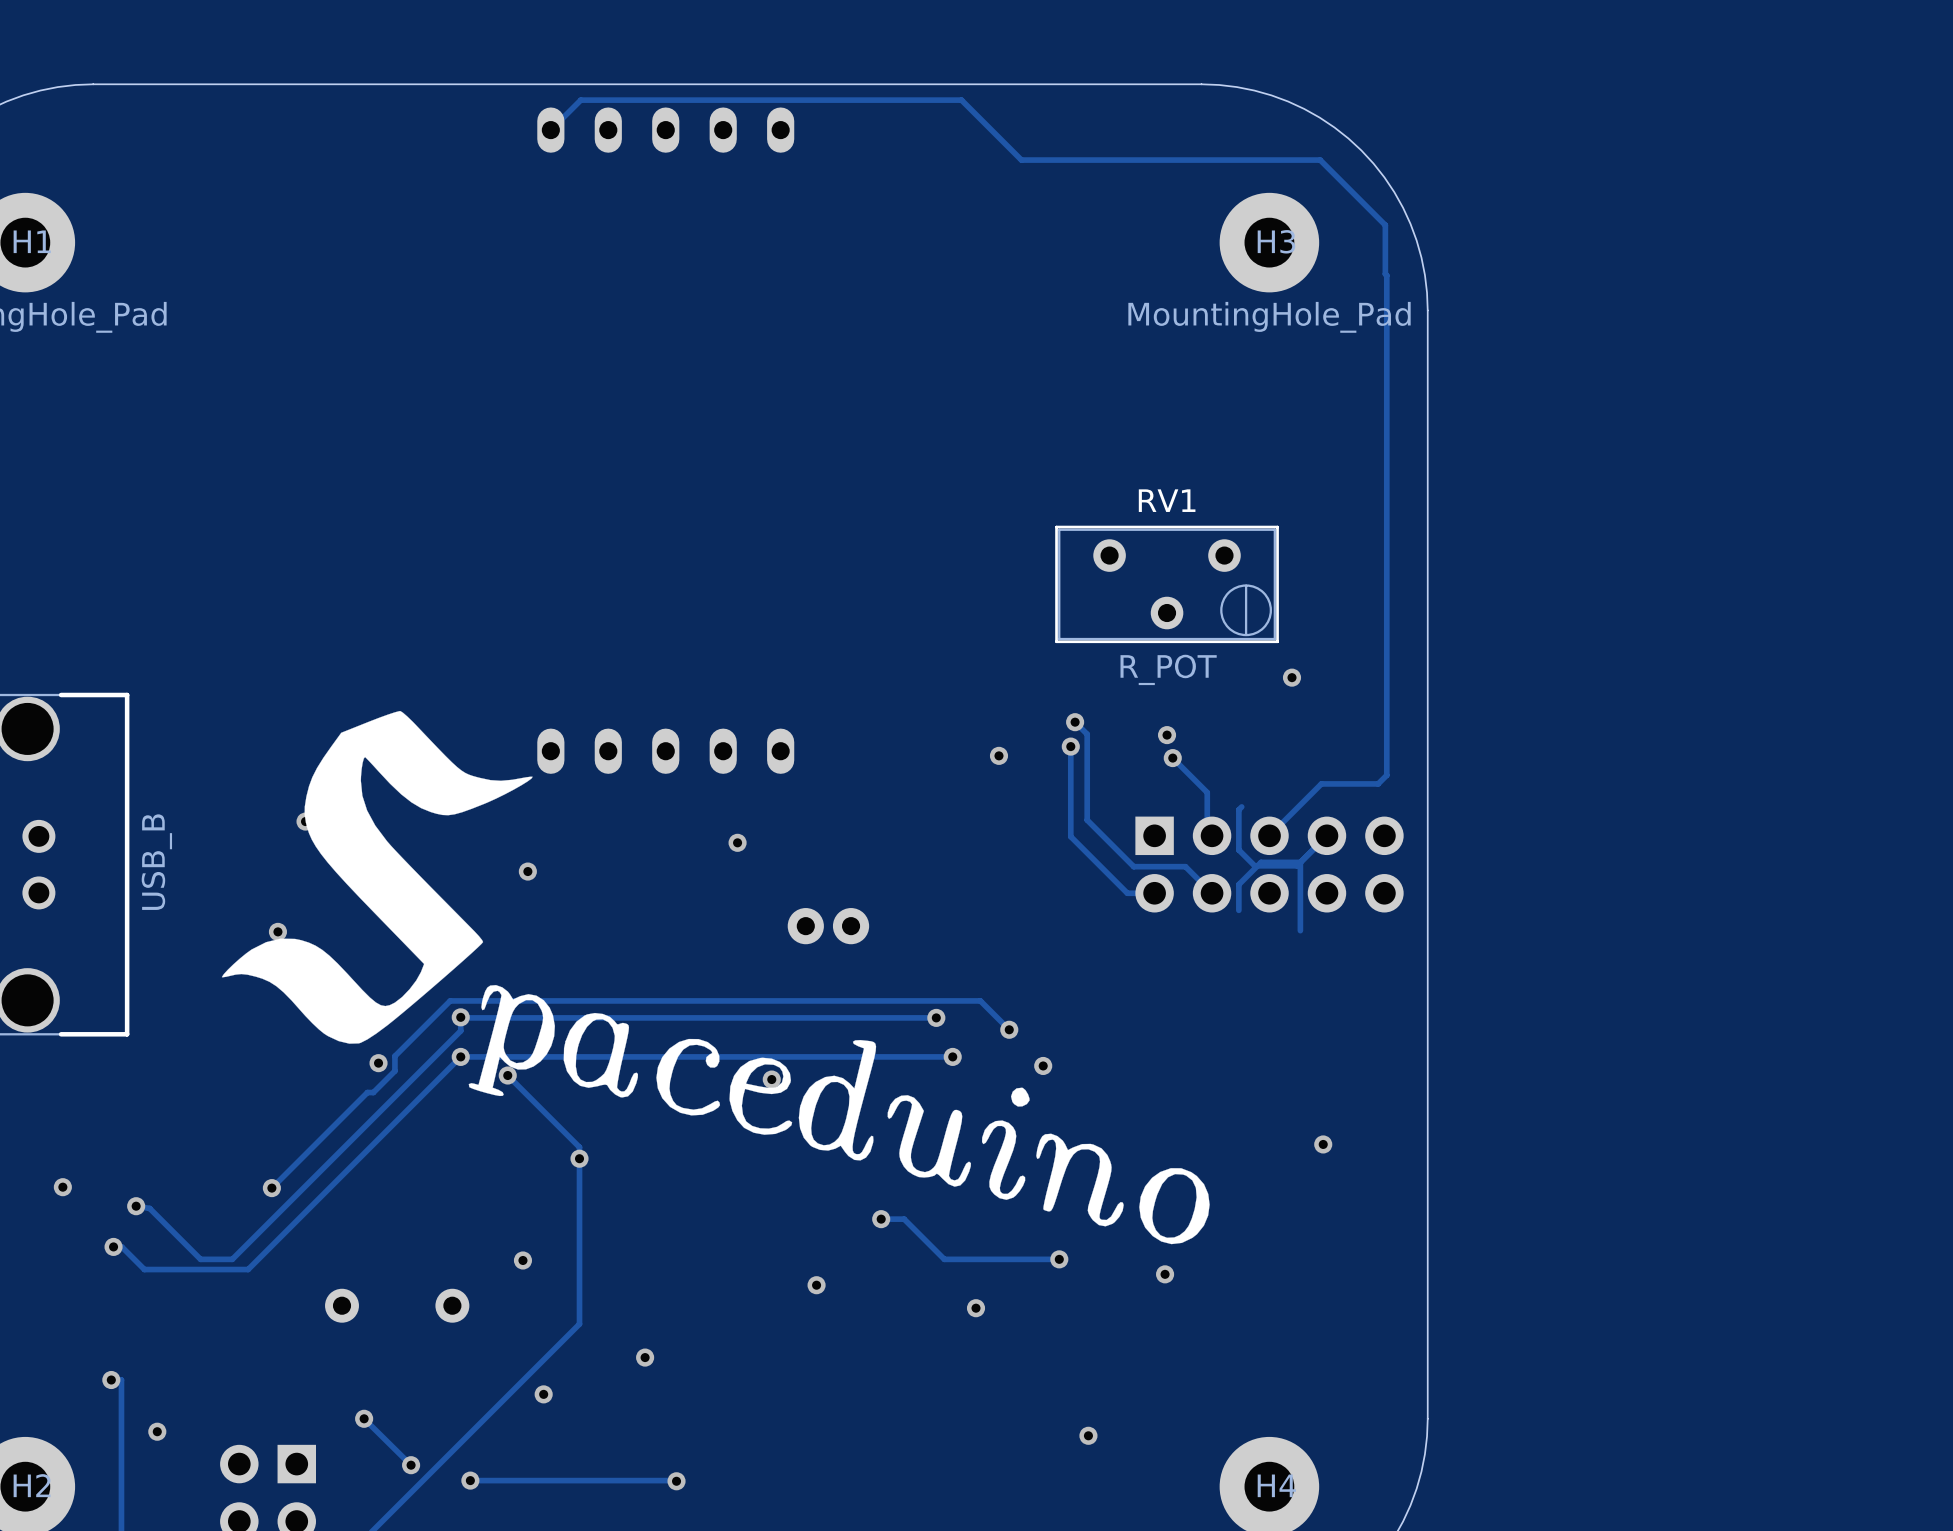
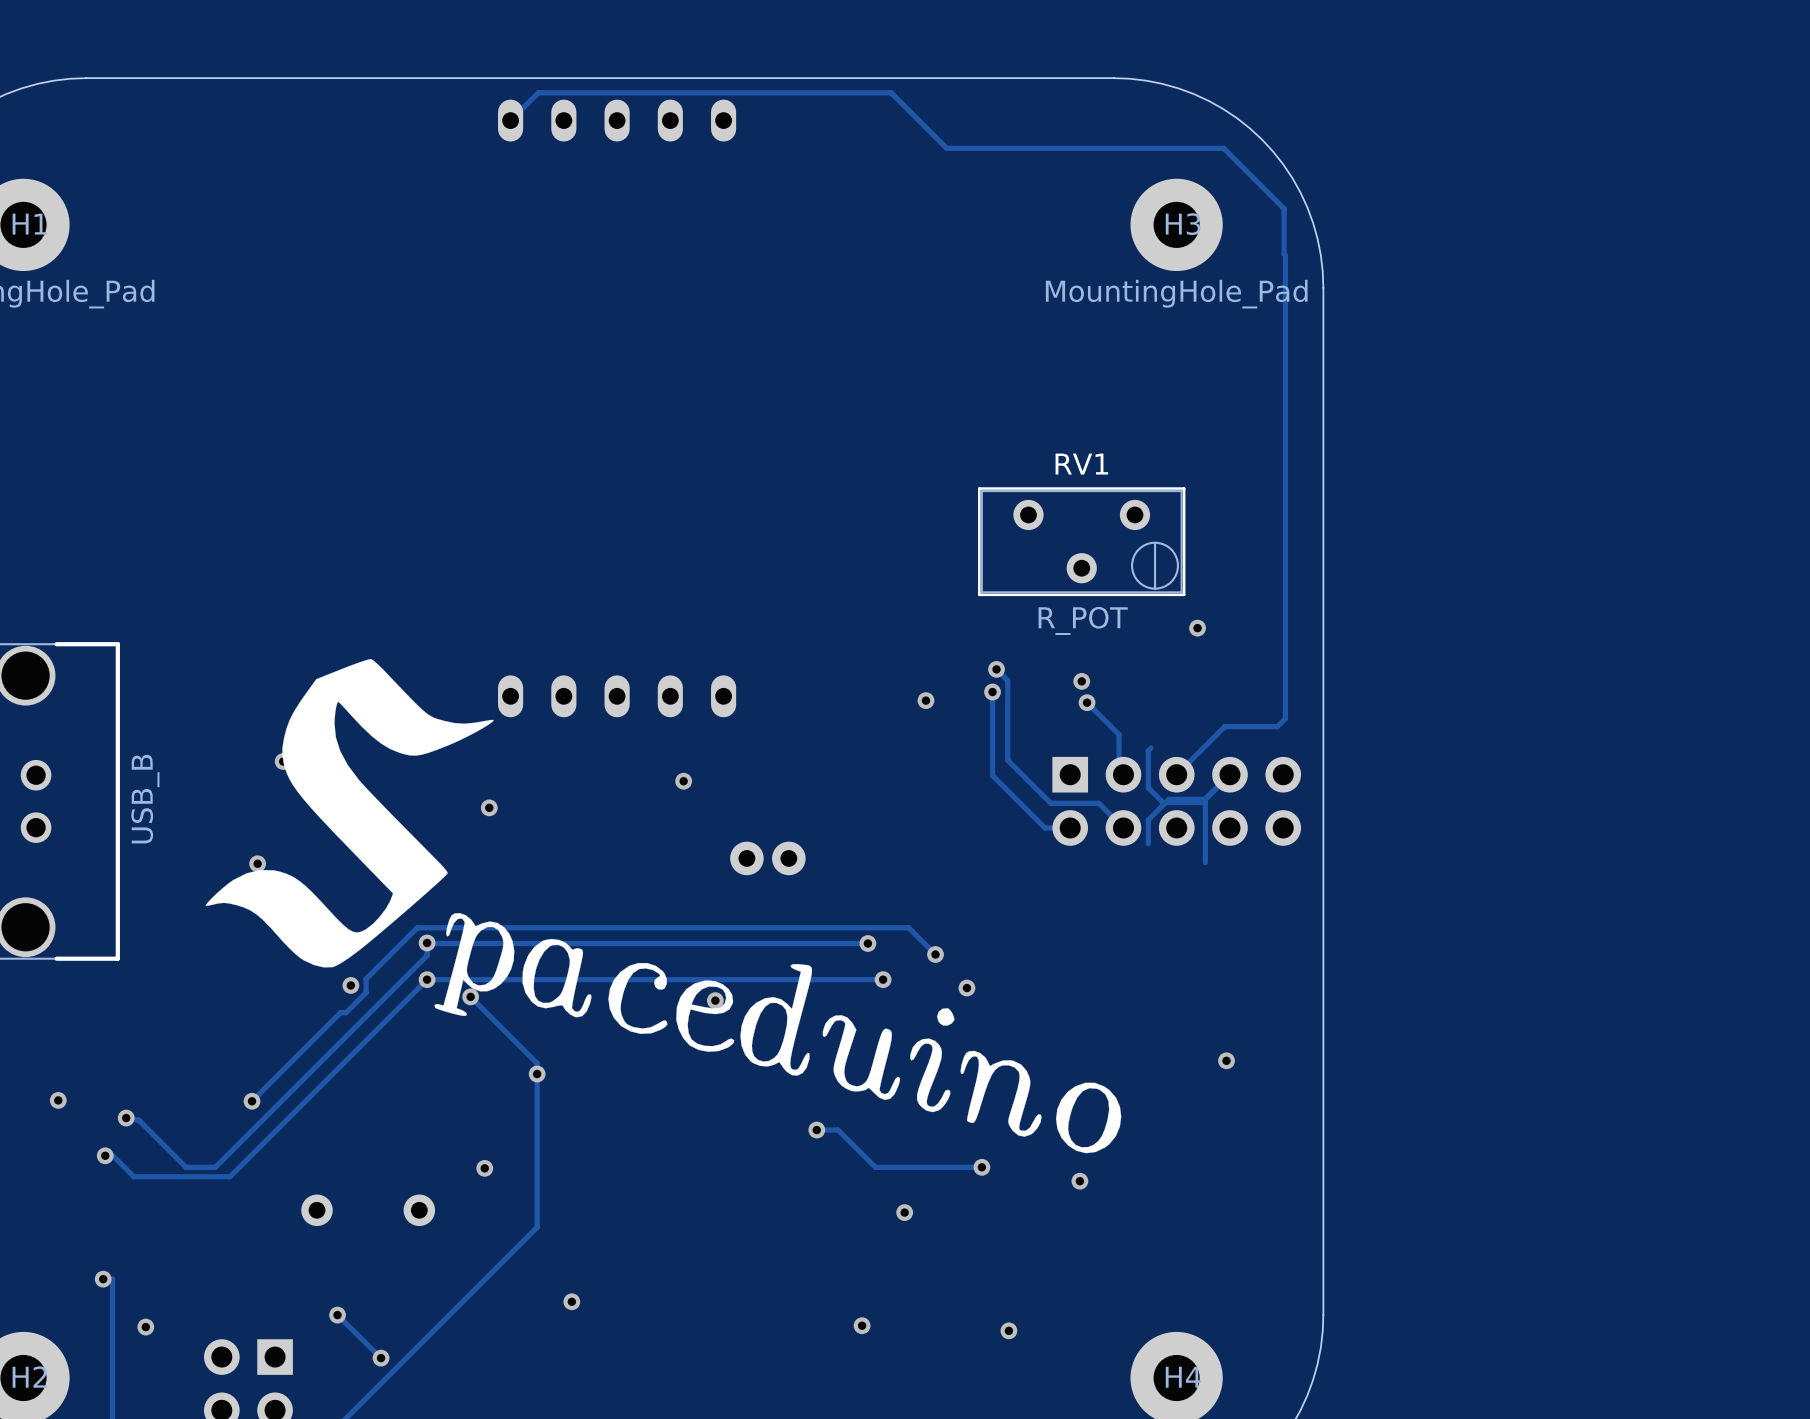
via: (816, 1285) -> none
via: (645, 1357) -> none
via: (543, 1394) -> none
via: none -> (571, 1301)
via: none -> (862, 1325)
track: (470, 1480) (676, 1481) -> none
via: (470, 1480) -> none
via: (676, 1481) -> none

